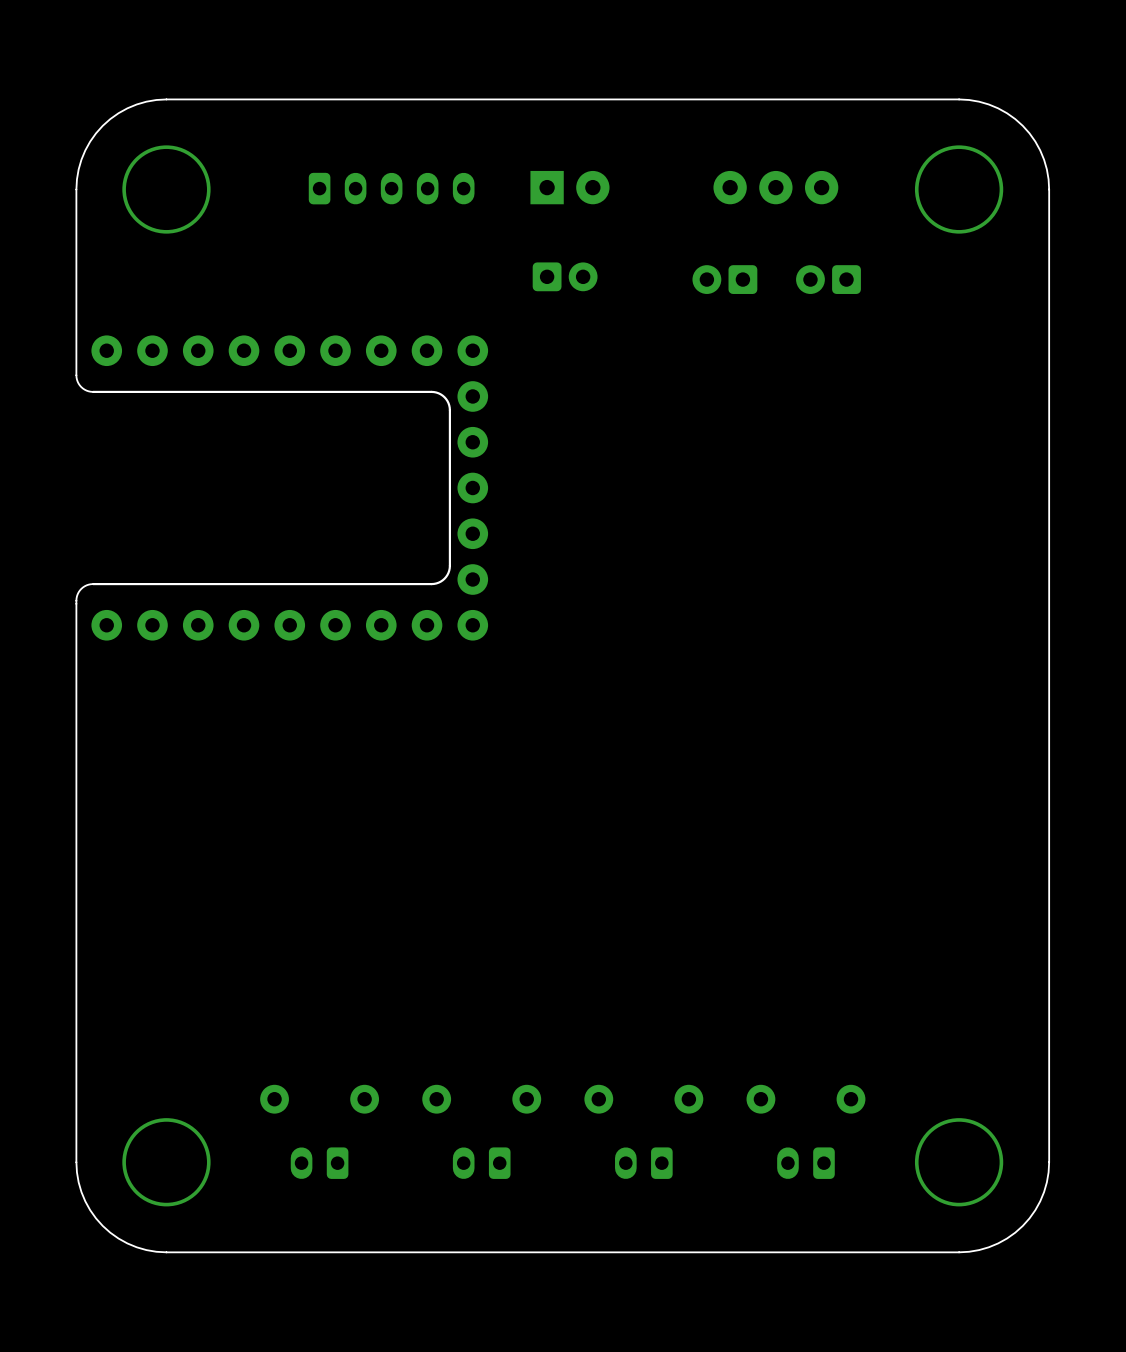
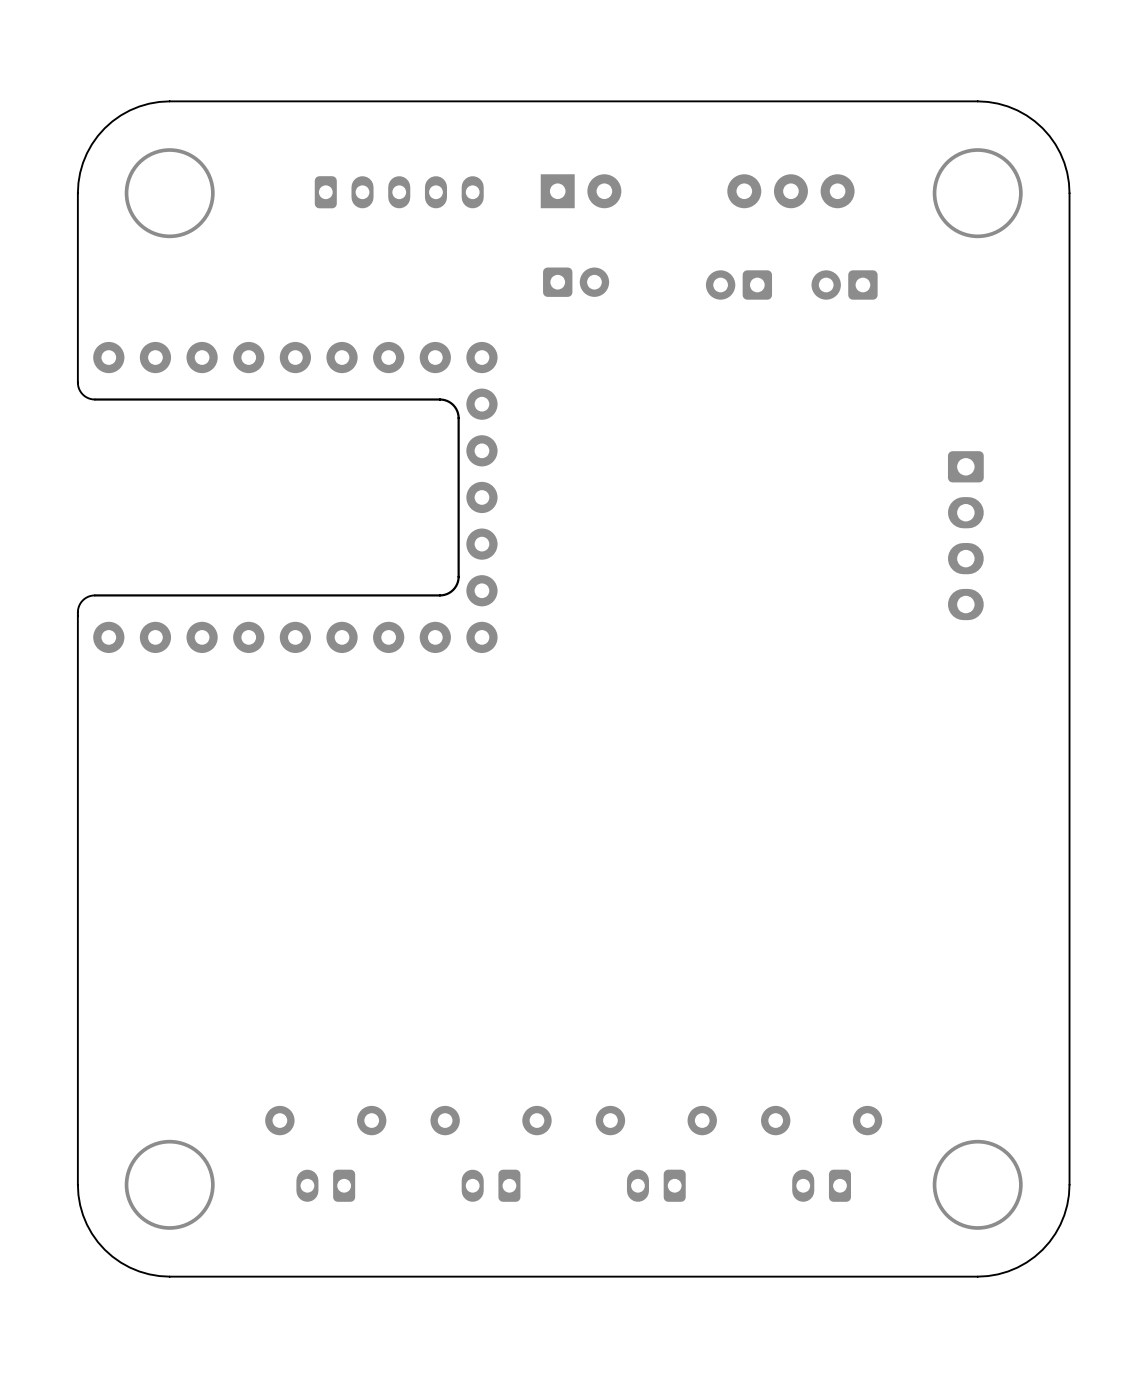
part: none -> (965, 535)

